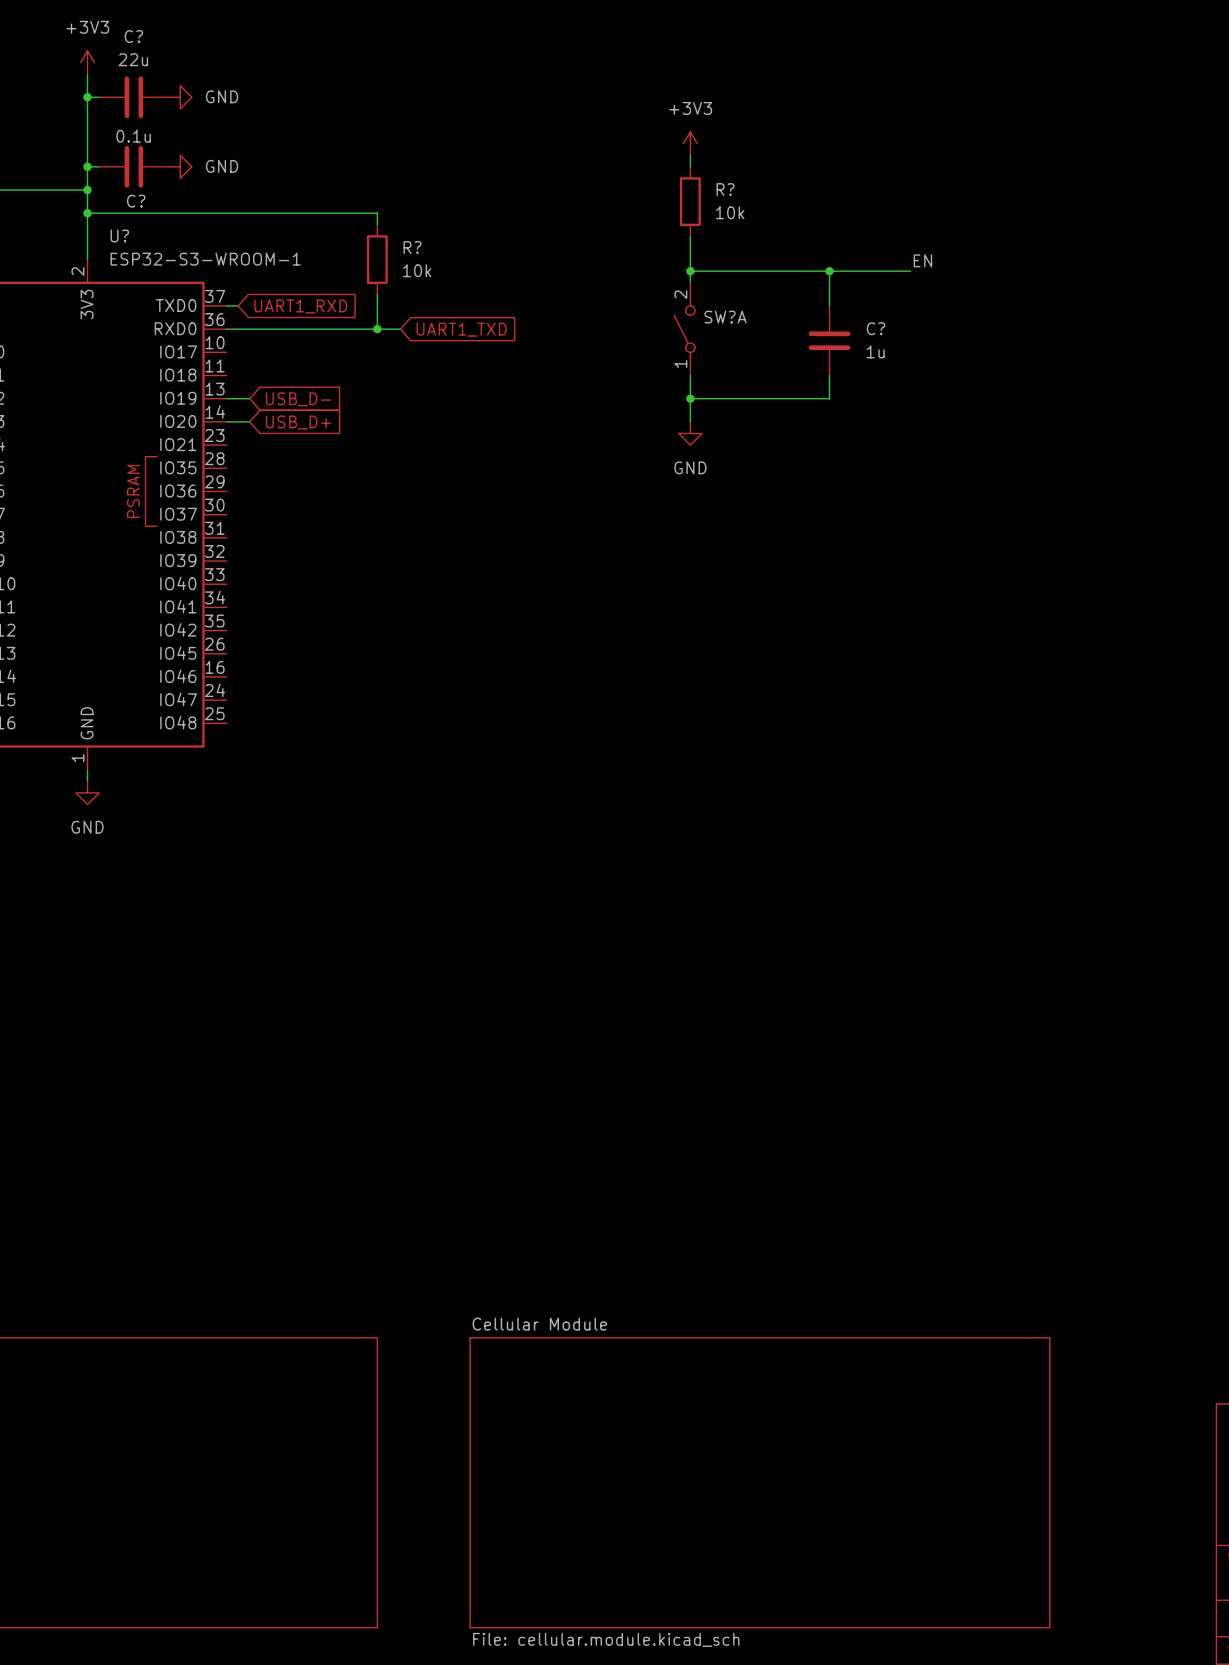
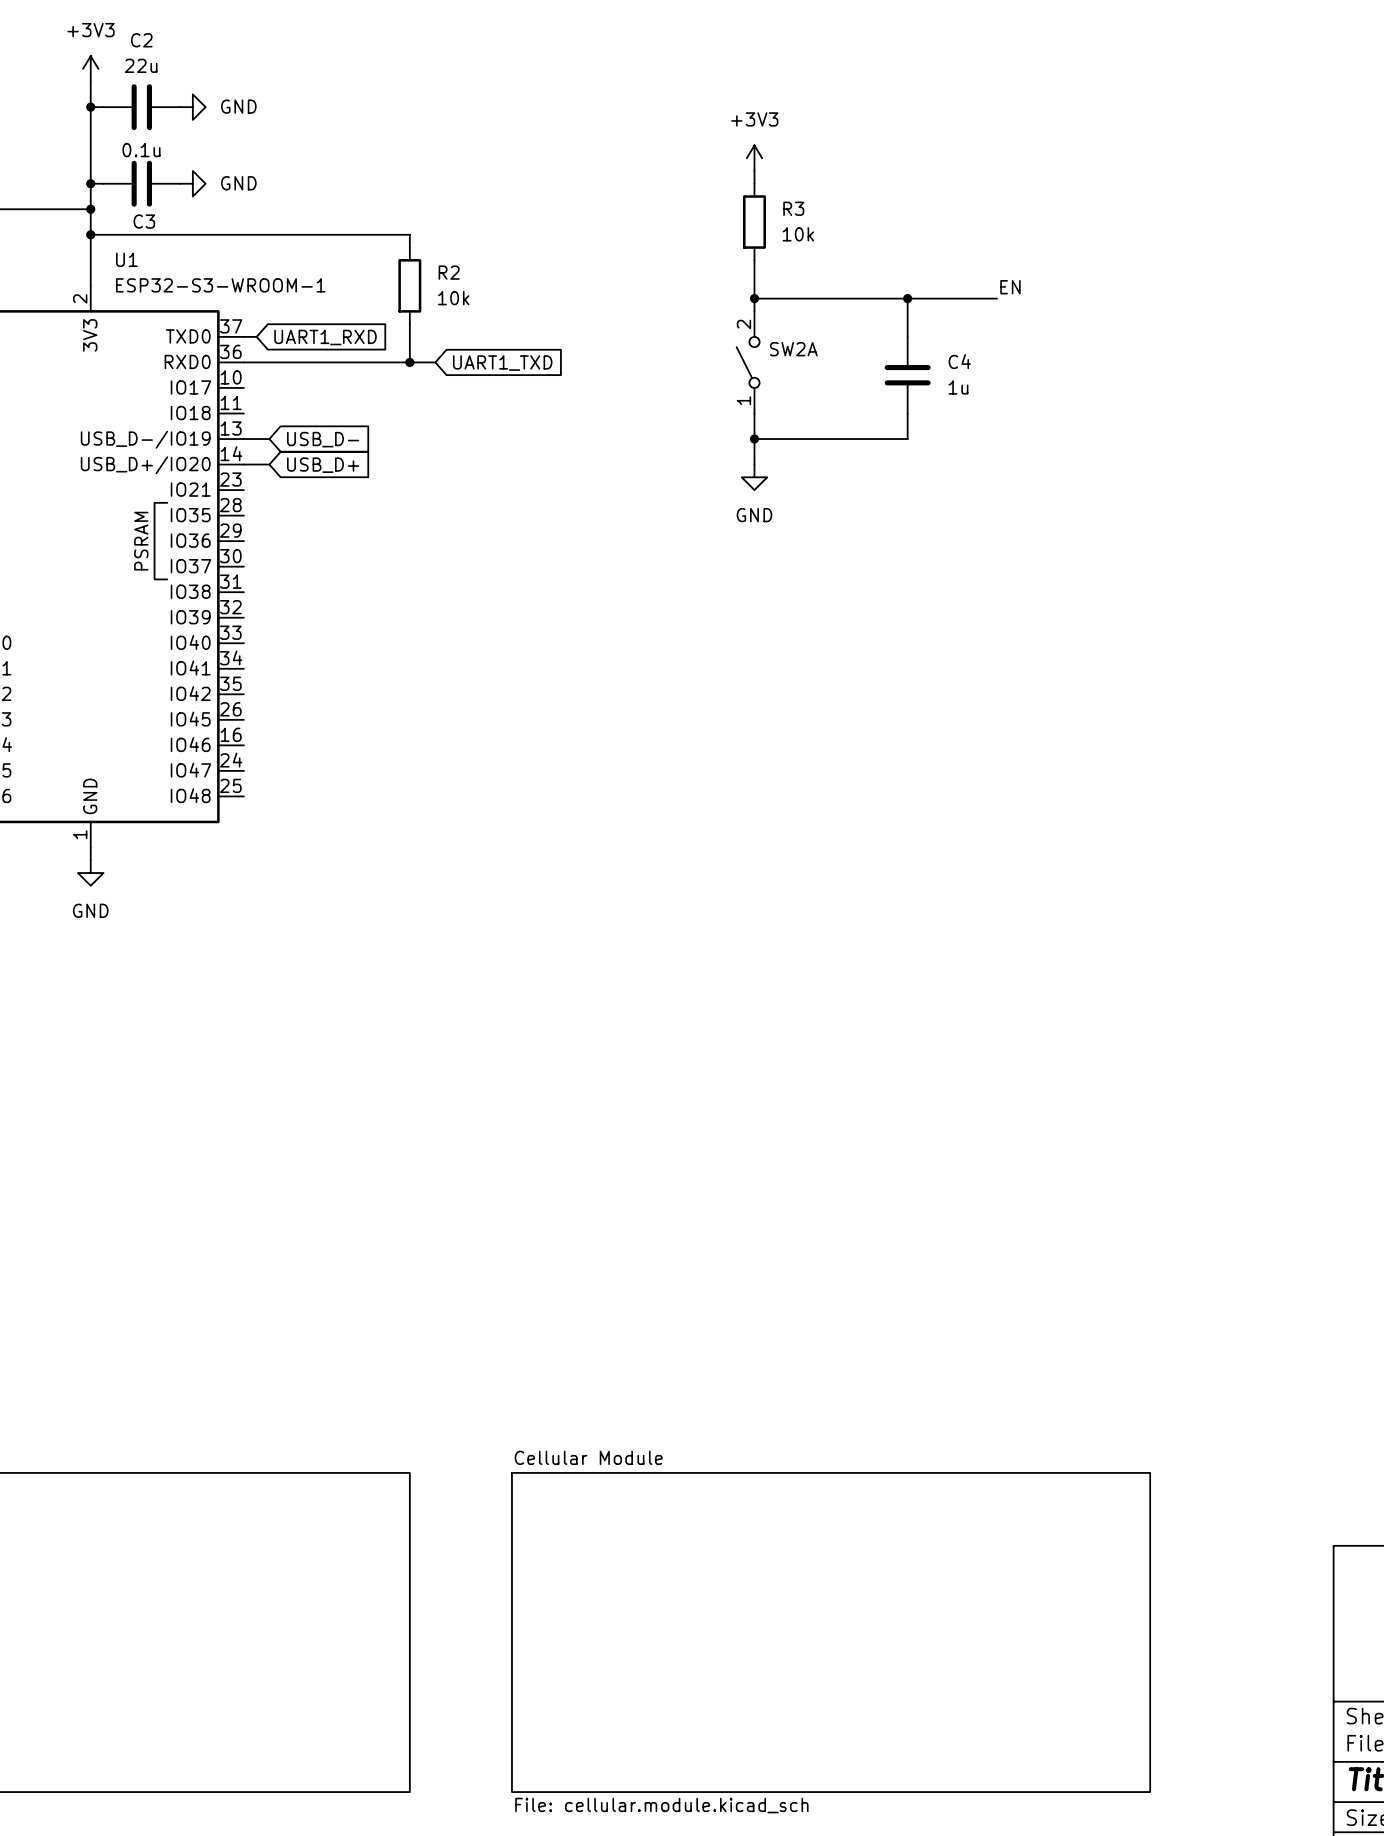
C? name: C? (133, 36) -> C2 (141, 40)
R? name: R? (725, 189) -> R3 (793, 208)
C? name: C? (136, 201) -> C3 (144, 221)
U? name: U? (119, 235) -> U1 (126, 259)
R? name: R? (412, 247) -> R2 (449, 272)
SW?A name: SW?A (725, 317) -> SW2A (793, 349)
C? name: C? (875, 328) -> C4 (959, 361)
U? pin name: IO19 (178, 398) -> USB_D-/IO19 (145, 439)
U? pin name: IO20 (178, 421) -> USB_D+/IO20 (145, 465)

